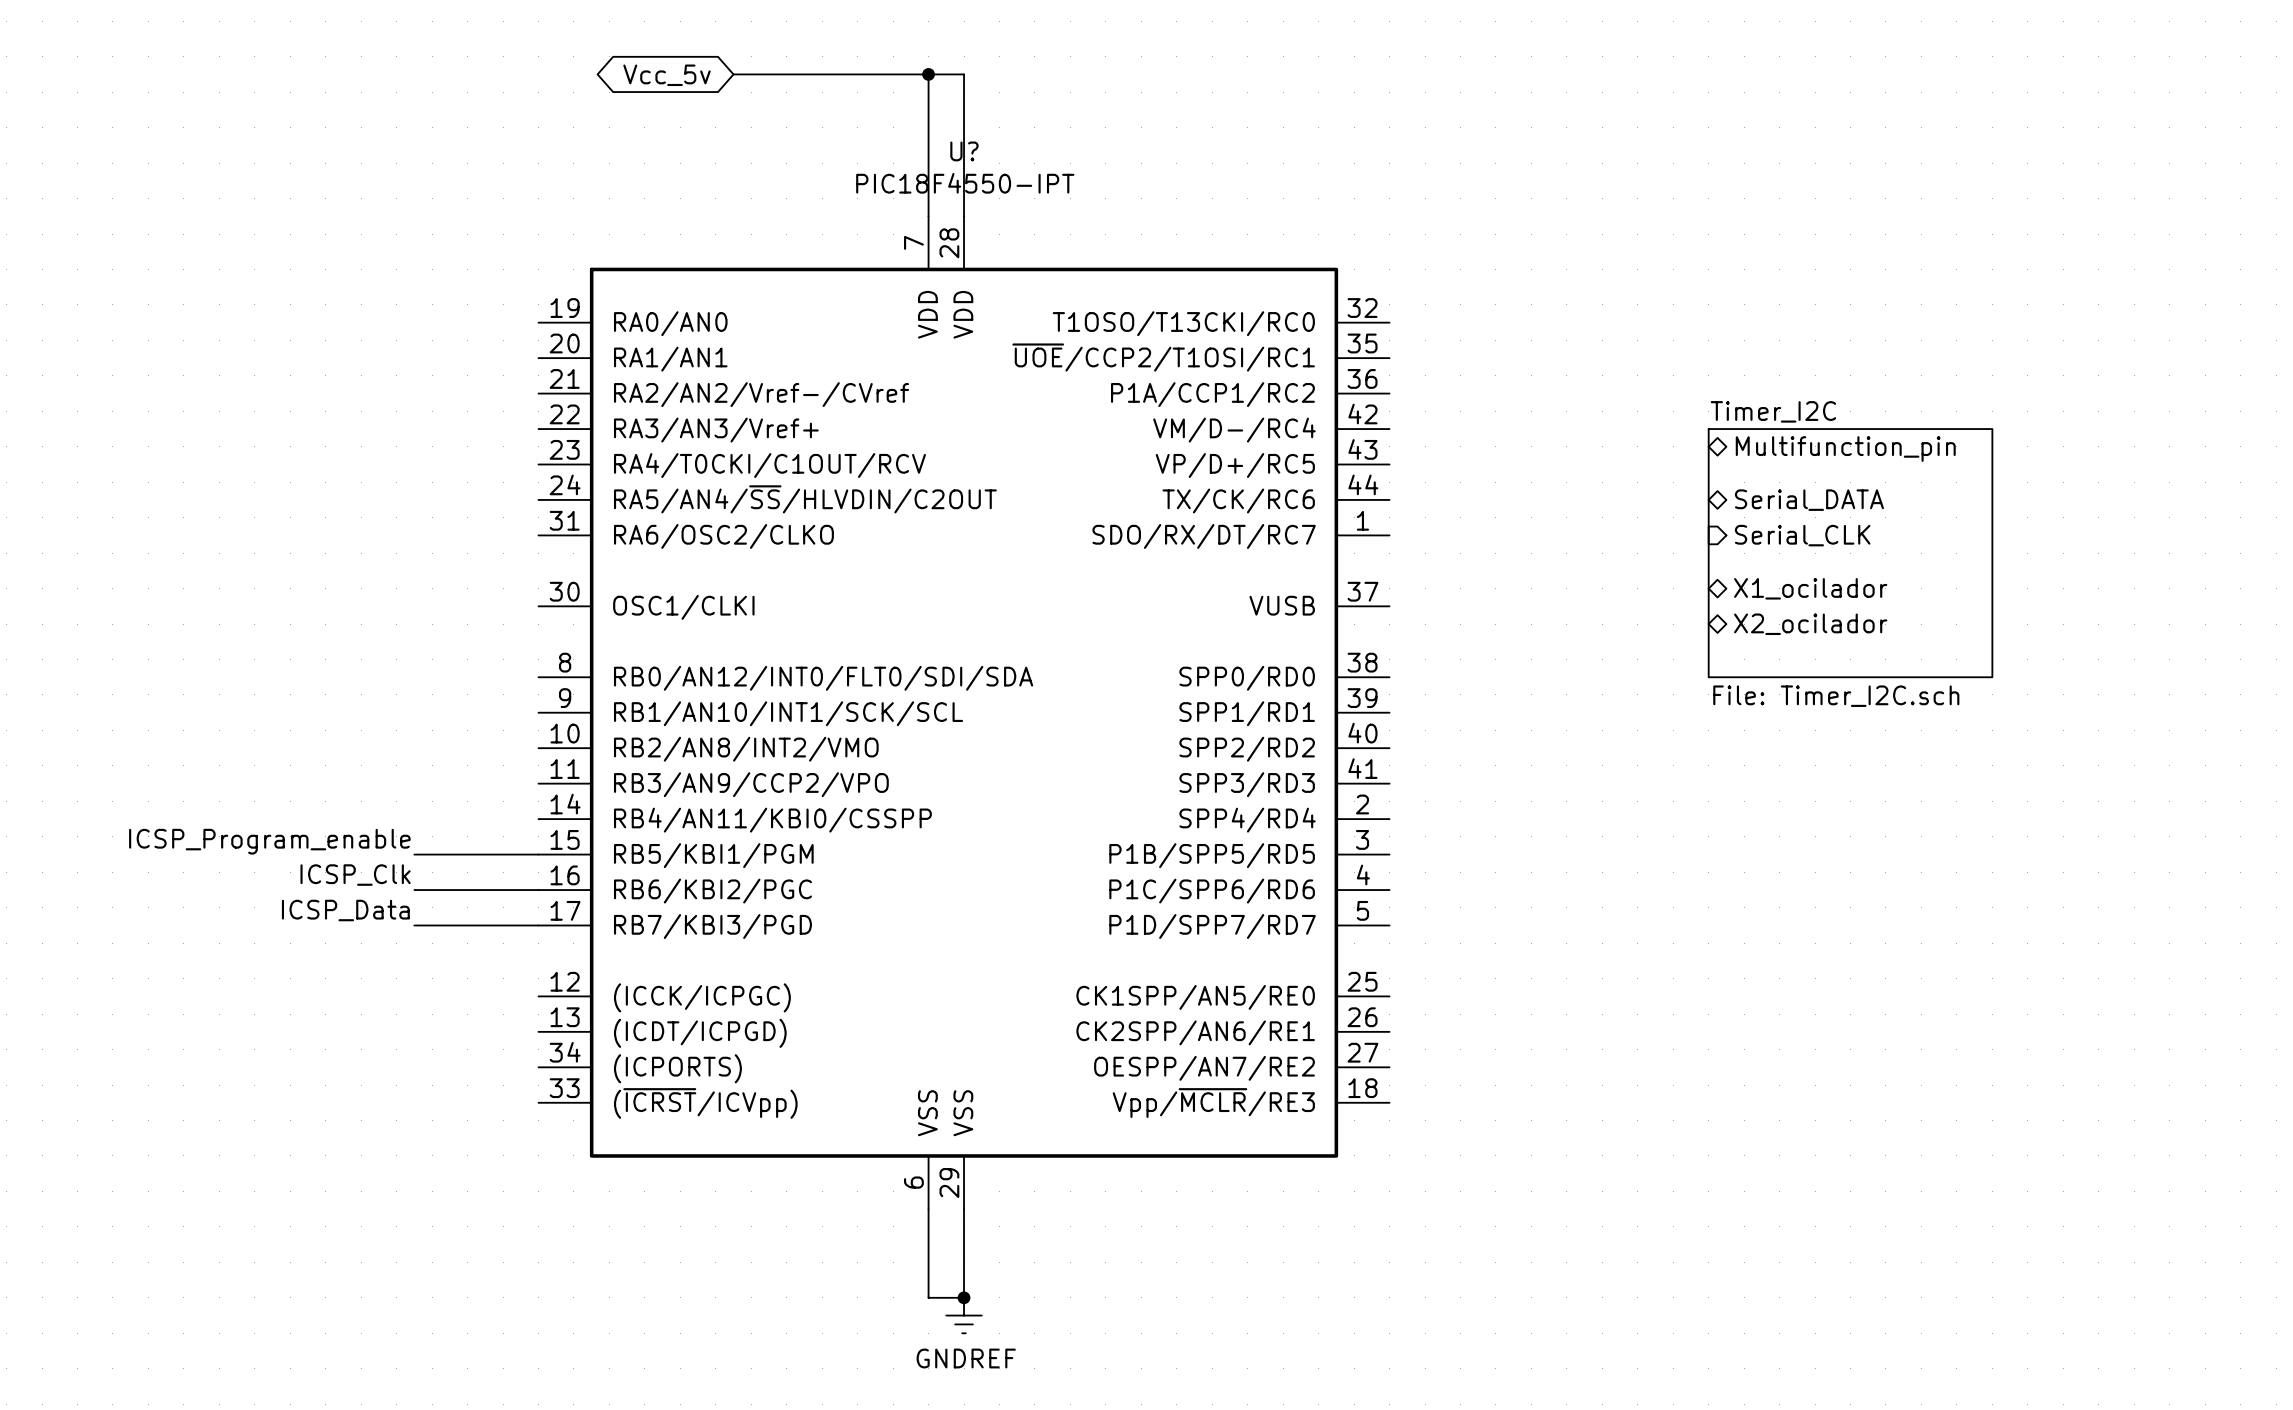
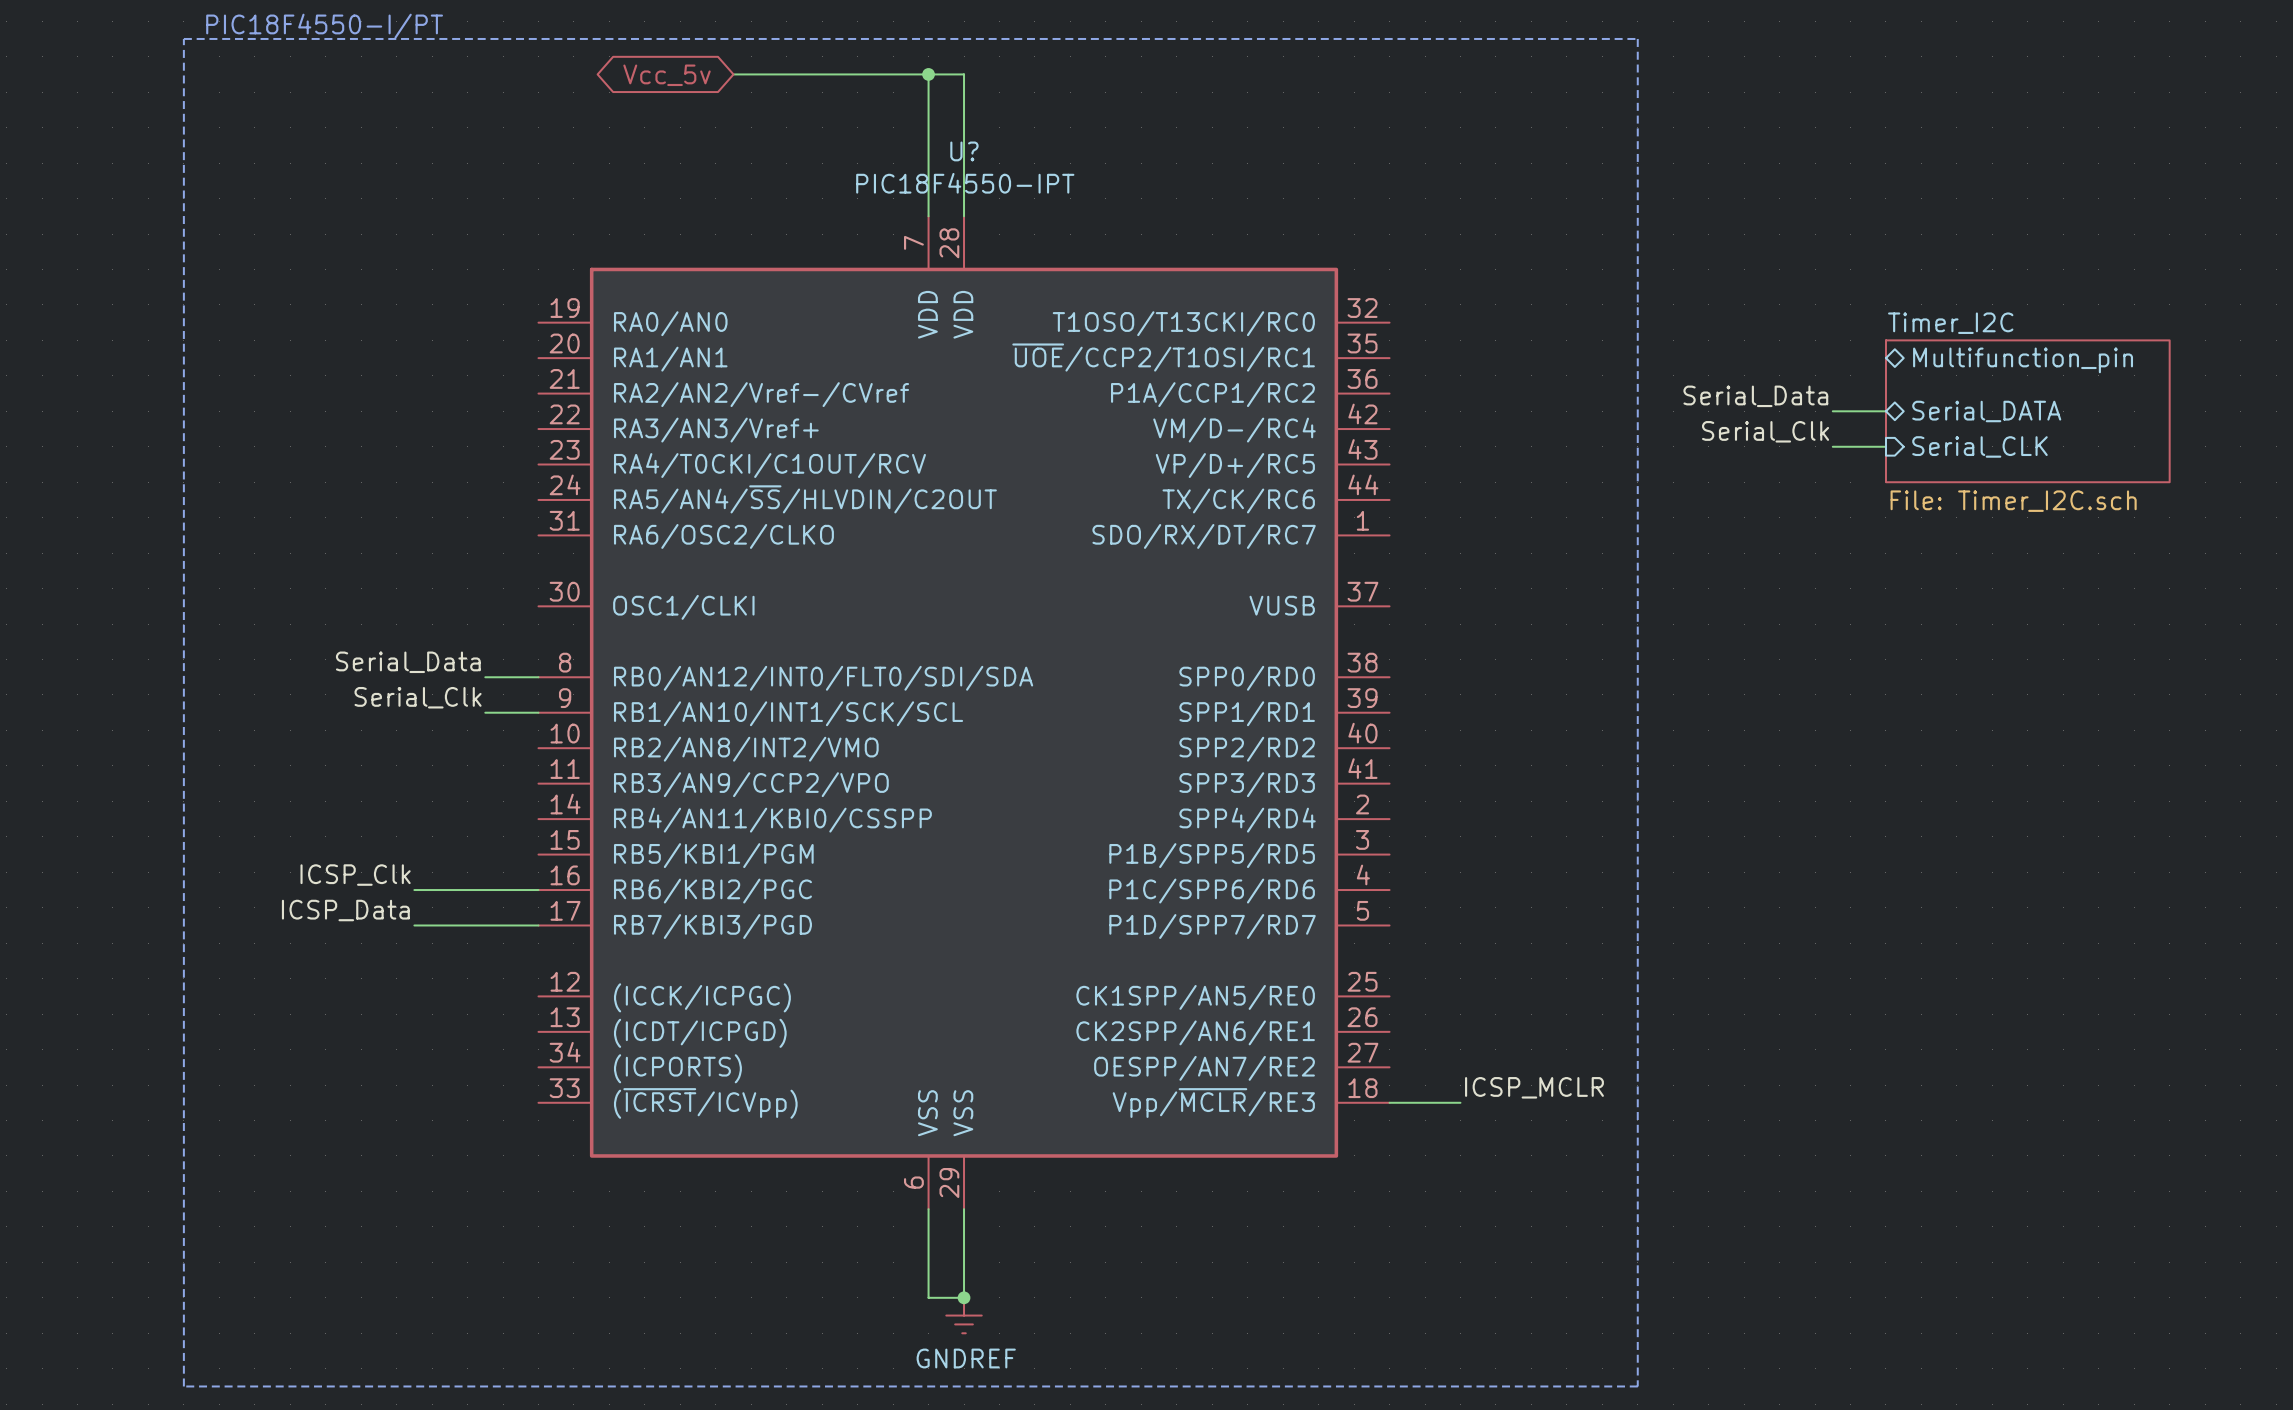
text: none -> PIC18F4550-I/PT (324, 26)
line: none -> (183, 38) (183, 1386) (1637, 1386) (1637, 38) (183, 38)
label: none -> Serial_Data (1755, 396)
sheet Timer_I2C name position: Timer_I2C (1773, 411) -> Timer_I2C (1950, 323)
wire: none -> (1832, 411) (1885, 411)
sheet Timer_I2C shape: [1708, 429, 1993, 678] -> [1885, 340, 2170, 483]
label: none -> Serial_Clk (1765, 431)
wire: none -> (1832, 446) (1885, 446)
sheet pin position: Multifunction_pin (1845, 449) -> Multifunction_pin (2023, 360)
sheet pin position: Serial_DATA (1809, 500) -> Serial_DATA (1986, 411)
sheet pin position: Serial_CLK (1802, 535) -> Serial_CLK (1979, 446)
sheet pin: X1_ocilador (1810, 588) -> none
sheet pin: X2_ocilador (1810, 624) -> none
label: none -> Serial_Data (408, 662)
wire: none -> (485, 677) (538, 677)
sheet Timer_I2C value position: File: Timer_I2C.sch (1836, 696) -> File: Timer_I2C.sch (2013, 501)
label: none -> Serial_Clk (418, 697)
wire: none -> (485, 712) (538, 712)
label: ICSP_Program_enable (269, 841) -> none
wire: (414, 854) (538, 854) -> none
label: none -> ICSP_MCLR (1534, 1087)
wire: none -> (1389, 1102) (1460, 1102)

